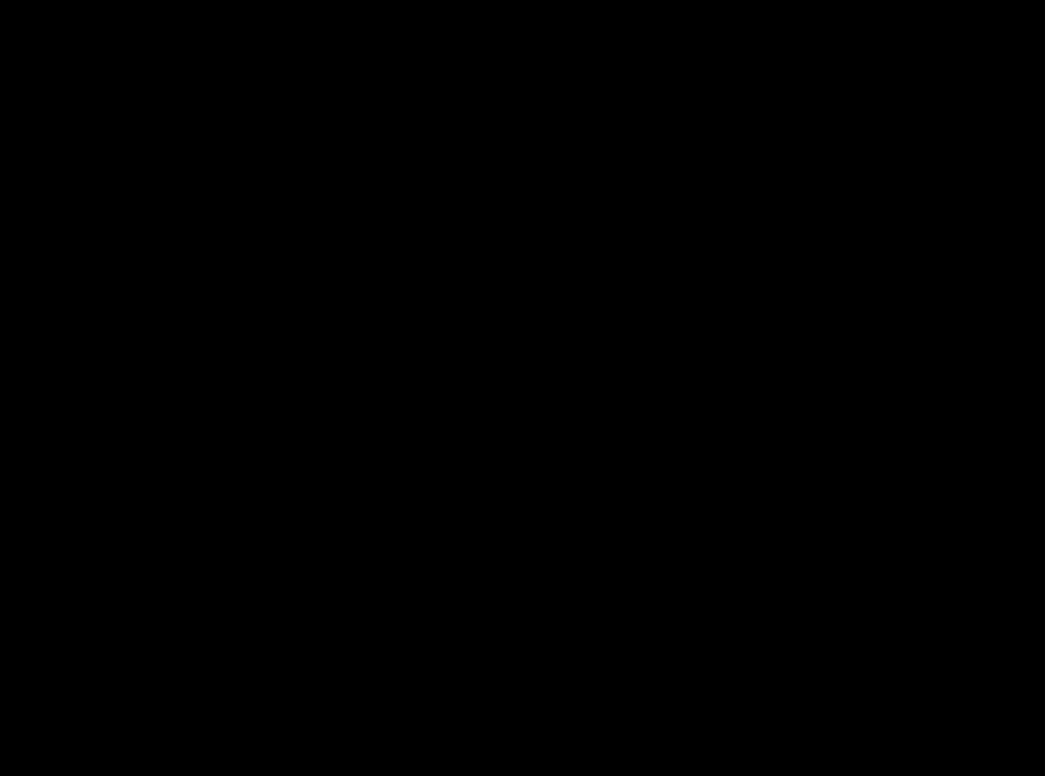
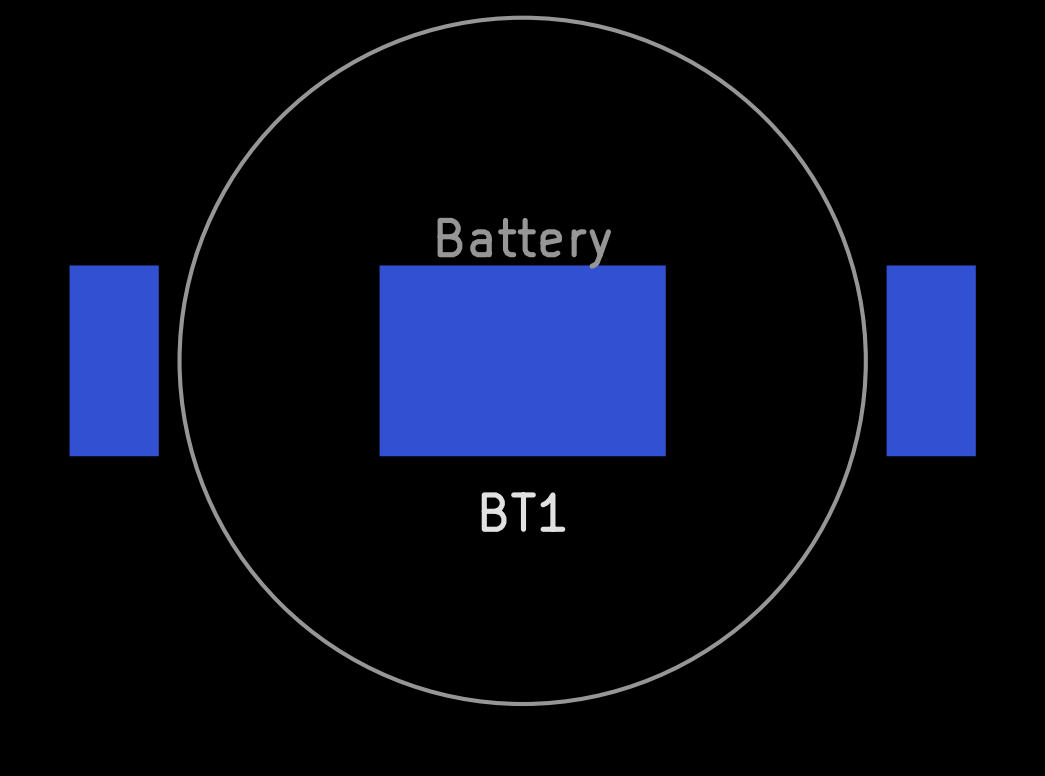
BT1: none -> Battery (522, 360)

